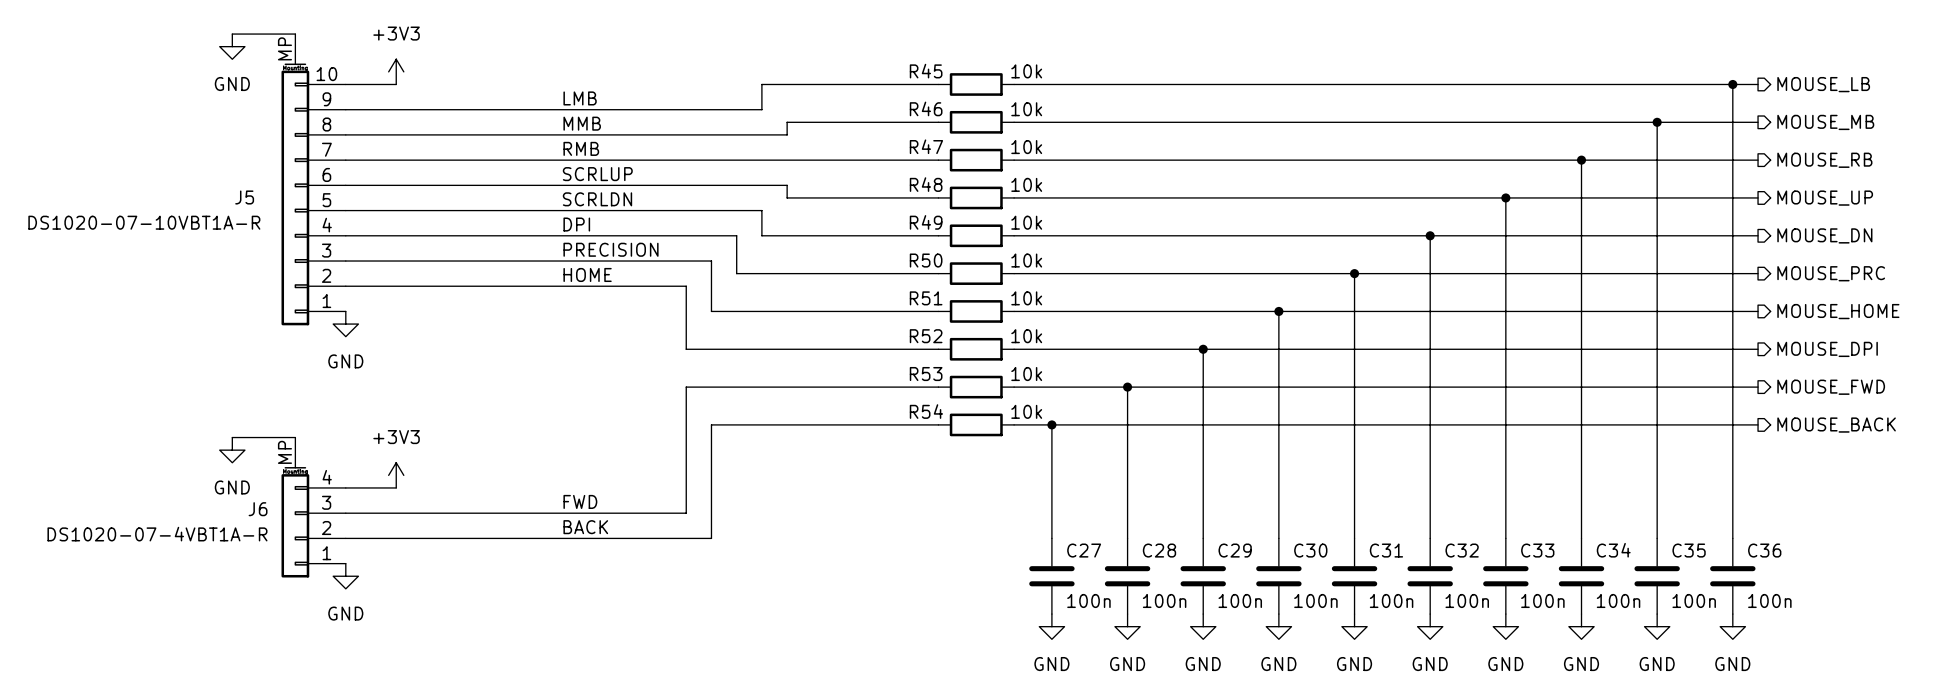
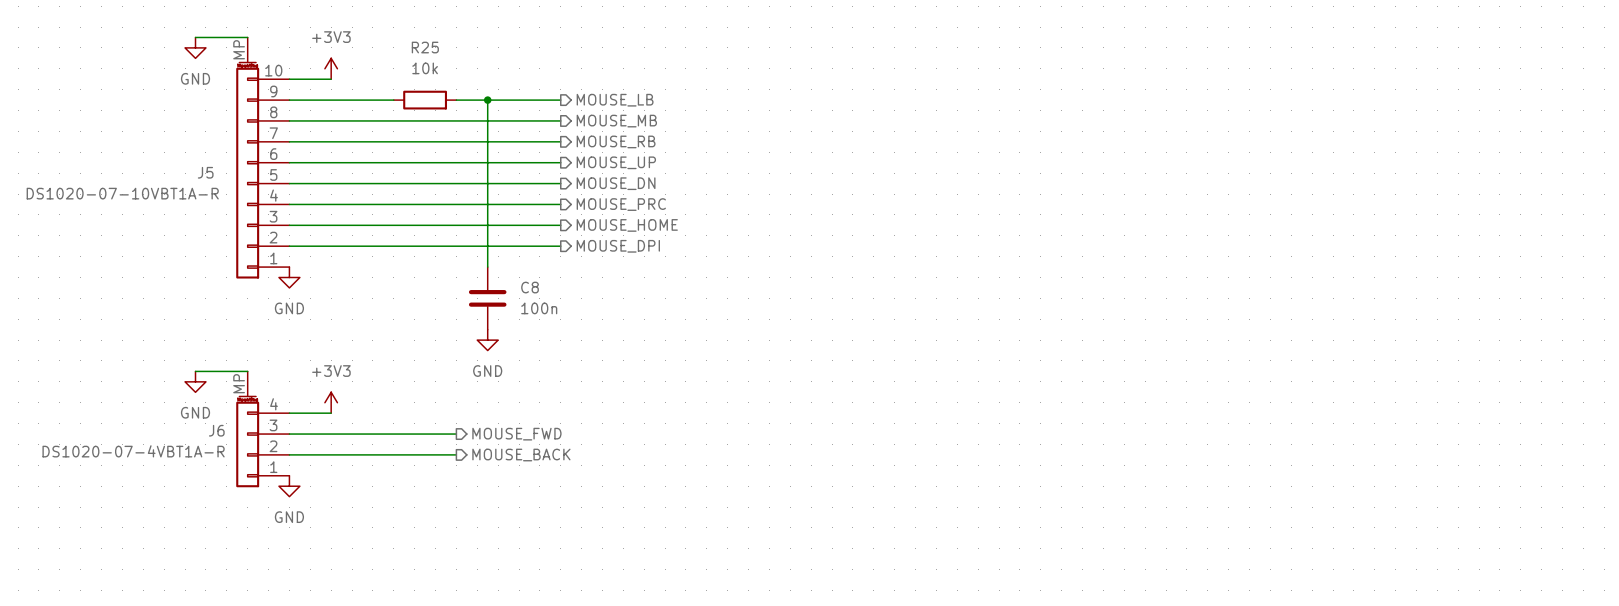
wire: (938, 84) (761, 84) (761, 109) (673, 109) -> none
R45: 10k (976, 84) -> none
wire: (1014, 84) (1758, 84) -> none
wire: (1732, 84) (1732, 538) -> none
junction: (1732, 84) -> none
hierarchical label: MOUSE_LB (1823, 84) -> none
label: LMB (580, 98) -> none
wire: (471, 109) (547, 109) -> none
R25: none -> 10k (425, 100)
wire: none -> (487, 100) (487, 267)
junction: none -> (487, 100)
hierarchical label: none -> MOUSE_LB (615, 100)
wire: (938, 122) (787, 122) (787, 134) (673, 134) -> none
R46: 10k (976, 122) -> none
wire: (1014, 122) (1758, 122) -> none
wire: (1657, 122) (1657, 538) -> none
junction: (1657, 122) -> none
hierarchical label: MOUSE_MB (1825, 122) -> none
label: MMB (582, 123) -> none
hierarchical label: none -> MOUSE_MB (616, 121)
label: RMB (581, 148) -> none
wire: (673, 160) (938, 160) -> none
hierarchical label: none -> MOUSE_RB (616, 141)
R47: 10k (976, 160) -> none
wire: (1014, 160) (1758, 160) -> none
wire: (1581, 160) (1581, 538) -> none
junction: (1581, 160) -> none
hierarchical label: MOUSE_RB (1824, 160) -> none
label: SCRLUP (597, 174) -> none
wire: (673, 185) (787, 185) (787, 197) (938, 197) -> none
hierarchical label: none -> MOUSE_UP (616, 162)
R48: 10k (976, 197) -> none
wire: (1014, 197) (1758, 197) -> none
wire: (1505, 197) (1505, 538) -> none
junction: (1505, 197) -> none
hierarchical label: MOUSE_UP (1825, 198) -> none
label: SCRLDN (597, 199) -> none
wire: (673, 210) (761, 210) (761, 235) (938, 235) -> none
hierarchical label: none -> MOUSE_DN (616, 183)
label: DPI (576, 224) -> none
wire: (673, 235) (736, 235) (736, 273) (938, 273) -> none
hierarchical label: none -> MOUSE_PRC (621, 204)
R49: 10k (976, 235) -> none
wire: (1014, 235) (1758, 235) -> none
wire: (1430, 235) (1430, 538) -> none
junction: (1430, 235) -> none
hierarchical label: MOUSE_DN (1824, 235) -> none
label: PRECISION (610, 249) -> none
wire: (673, 261) (711, 261) (711, 311) (938, 311) -> none
hierarchical label: none -> MOUSE_HOME (627, 225)
R50: 10k (976, 273) -> none
wire: (1014, 273) (1758, 273) -> none
wire: (1354, 273) (1354, 538) -> none
junction: (1354, 273) -> none
hierarchical label: MOUSE_PRC (1831, 273) -> none
label: HOME (587, 274) -> none
wire: (673, 286) (686, 286) (686, 349) (938, 349) -> none
hierarchical label: none -> MOUSE_DPI (618, 246)
R51: 10k (976, 311) -> none
wire: (1014, 311) (1758, 311) -> none
wire: (1278, 311) (1278, 538) -> none
junction: (1278, 311) -> none
hierarchical label: MOUSE_HOME (1838, 311) -> none
C8: none -> 100n (487, 298)
R52: 10k (976, 349) -> none
wire: (1014, 349) (1758, 349) -> none
wire: (1203, 349) (1203, 538) -> none
junction: (1203, 349) -> none
hierarchical label: MOUSE_DPI (1827, 349) -> none
wire: (938, 387) (686, 387) (686, 513) (547, 513) -> none
R53: 10k (976, 387) -> none
wire: (1014, 387) (1758, 387) -> none
wire: (1127, 387) (1127, 538) -> none
junction: (1127, 387) -> none
hierarchical label: MOUSE_FWD (1831, 387) -> none
power symbol: none -> GND (487, 340)
wire: (938, 424) (711, 424) (711, 538) (547, 538) -> none
R54: 10k (976, 424) -> none
wire: (1014, 424) (1758, 424) -> none
wire: (1051, 424) (1051, 538) -> none
junction: (1051, 424) -> none
hierarchical label: MOUSE_BACK (1836, 425) -> none
label: FWD (580, 501) -> none
hierarchical label: none -> MOUSE_FWD (516, 434)
label: BACK (585, 527) -> none
hierarchical label: none -> MOUSE_BACK (521, 455)
C27: 100n (1051, 576) -> none
C28: 100n (1127, 576) -> none
C29: 100n (1203, 576) -> none
C30: 100n (1278, 576) -> none
C31: 100n (1354, 576) -> none
C32: 100n (1430, 576) -> none
C33: 100n (1505, 576) -> none
C34: 100n (1581, 576) -> none
C35: 100n (1657, 576) -> none
C36: 100n (1732, 576) -> none
power symbol: GND (1051, 626) -> none
power symbol: GND (1127, 626) -> none
power symbol: GND (1203, 626) -> none
power symbol: GND (1278, 626) -> none
power symbol: GND (1354, 626) -> none
power symbol: GND (1430, 626) -> none
power symbol: GND (1505, 626) -> none
power symbol: GND (1581, 626) -> none
power symbol: GND (1657, 626) -> none
power symbol: GND (1732, 626) -> none

